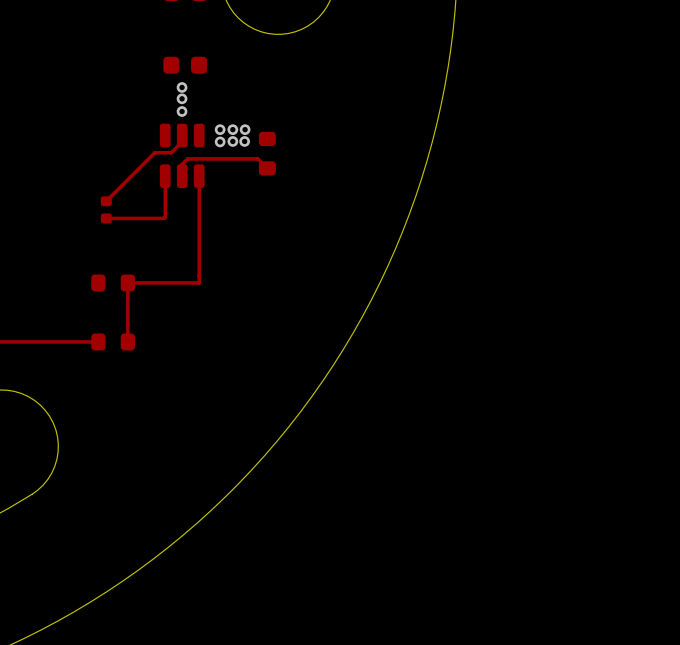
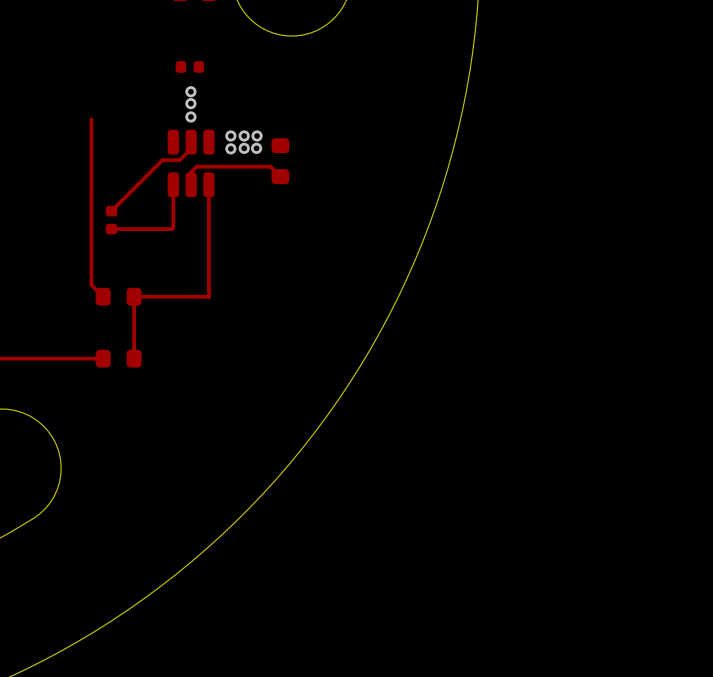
part footprint: [163, 56, 208, 74] -> [175, 61, 205, 73]
top track: none -> (91, 119) (91, 285) (103, 296)

